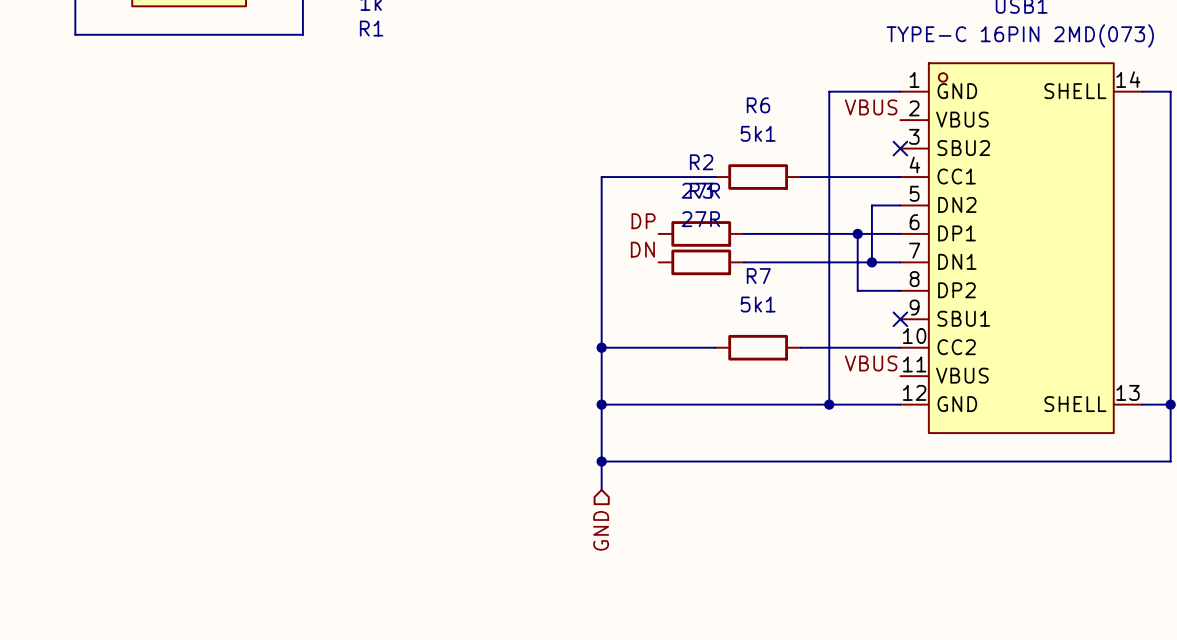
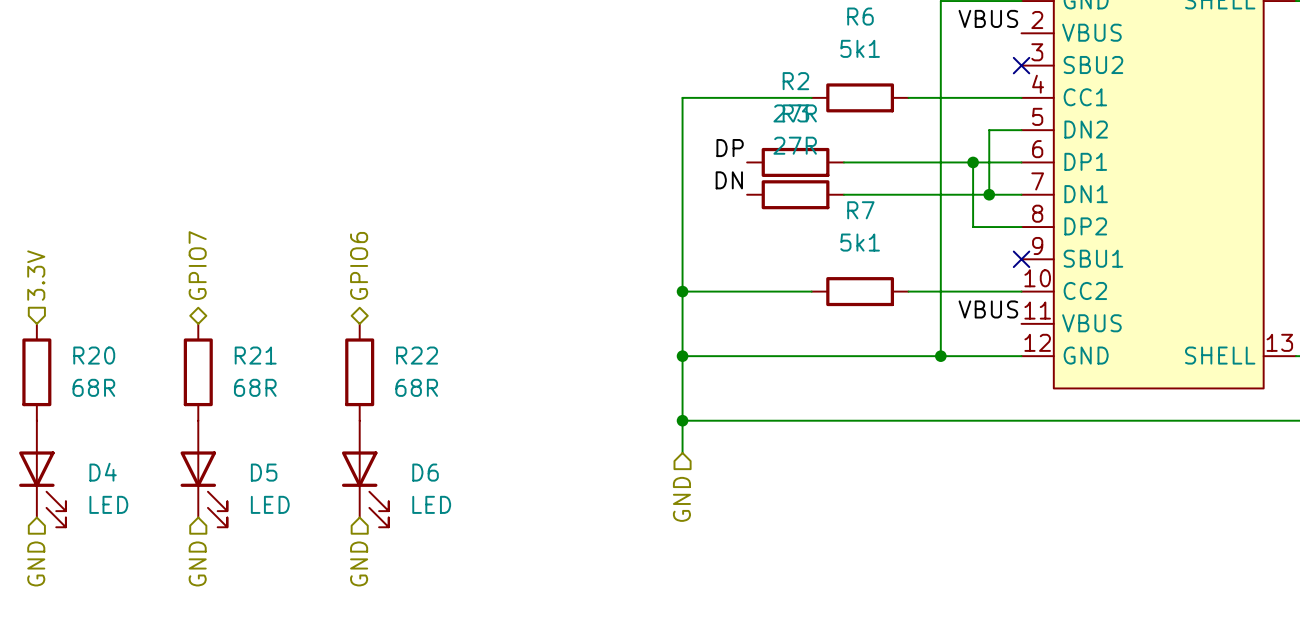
hierarchical label: none -> GPIO7 (197, 265)
hierarchical label: none -> GPIO6 (359, 265)
hierarchical label: none -> 3.3V (36, 275)
R20: none -> 68R (36, 372)
R21: none -> 68R (198, 372)
R22: none -> 68R (359, 372)
D4: none -> LED (42, 473)
D5: none -> LED (203, 473)
D6: none -> LED (365, 473)
hierarchical label: none -> GND (36, 563)
hierarchical label: none -> GND (197, 563)
hierarchical label: none -> GND (359, 563)

